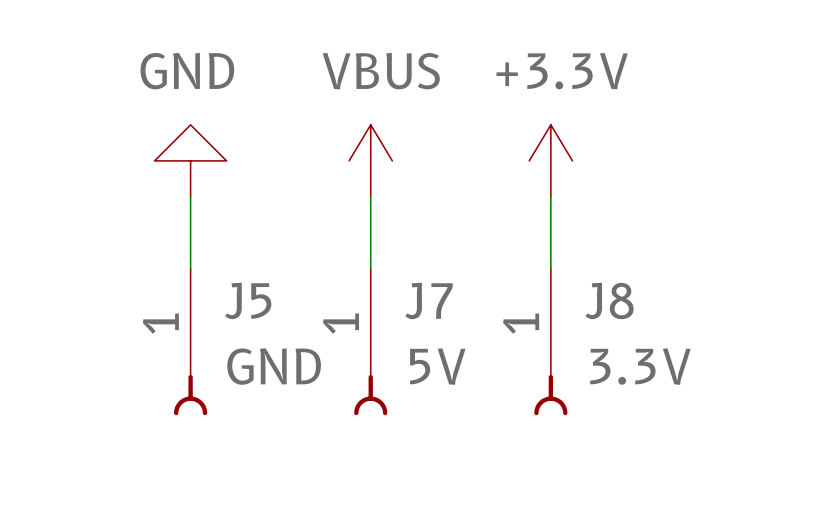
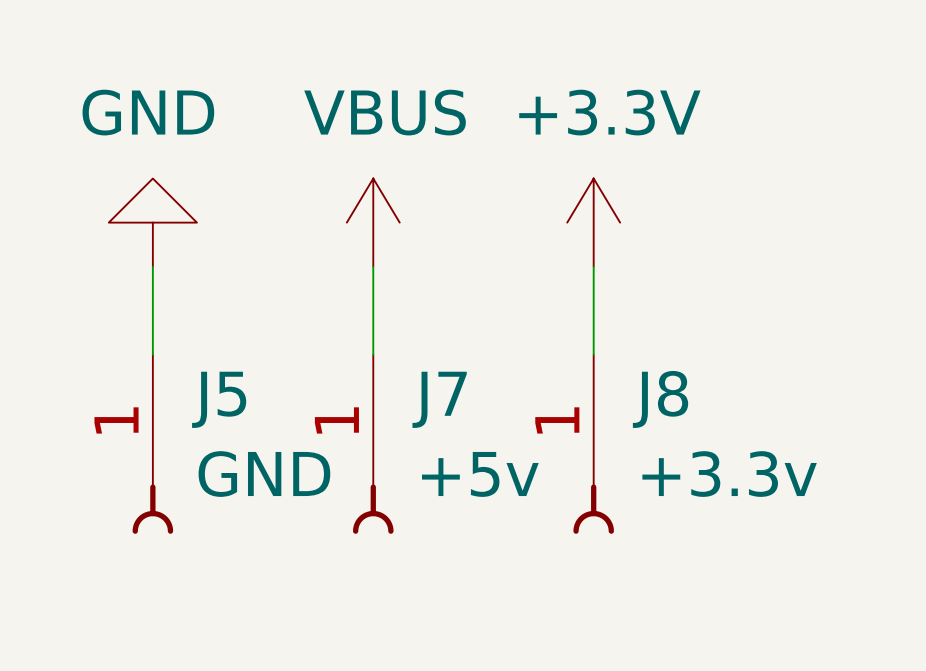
J7 value: 5V (437, 366) -> +5v (480, 474)
J8 value: 3.3V (640, 366) -> +3.3v (729, 474)

